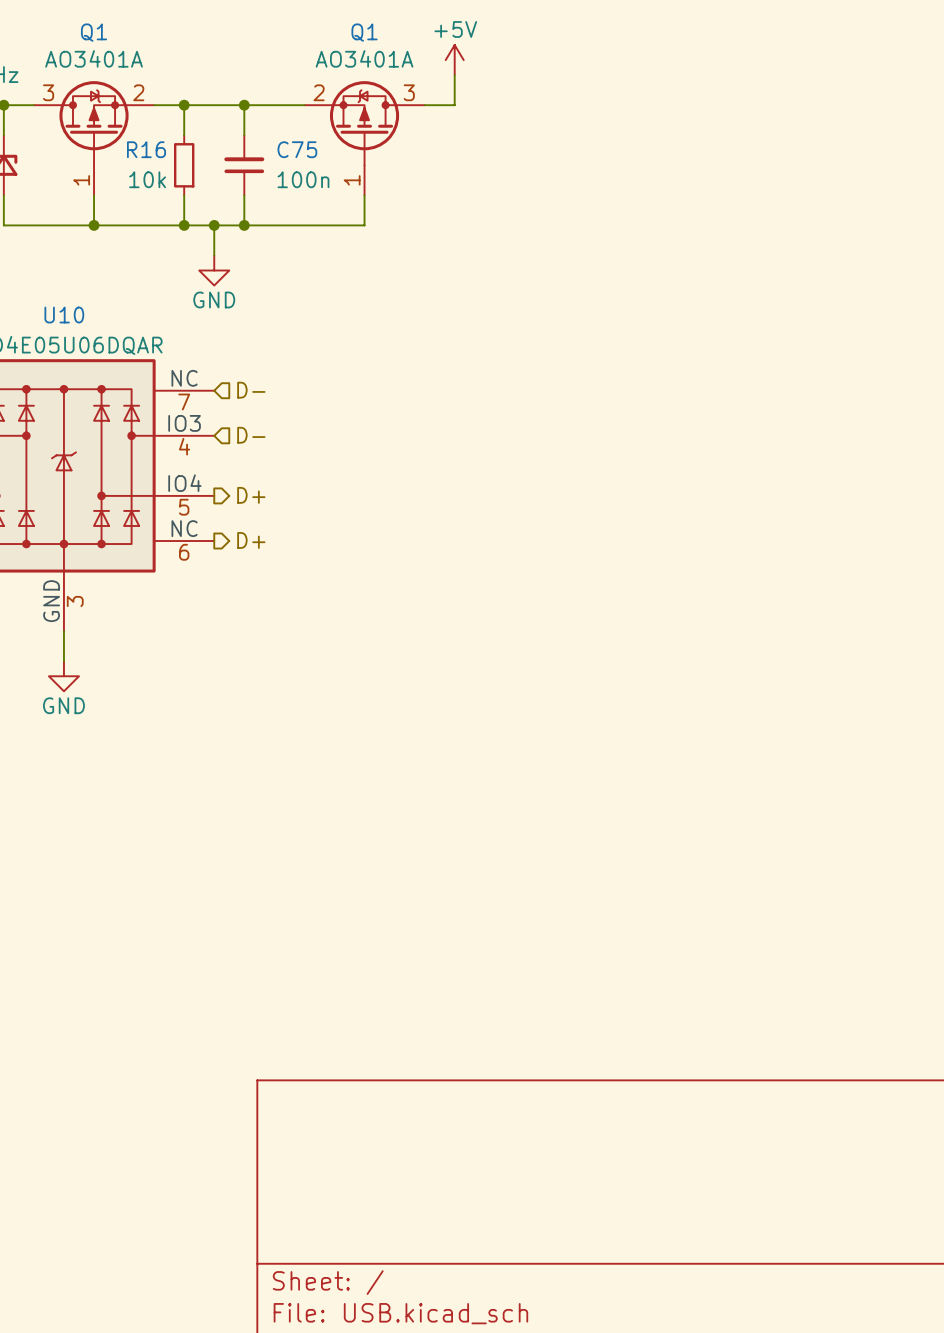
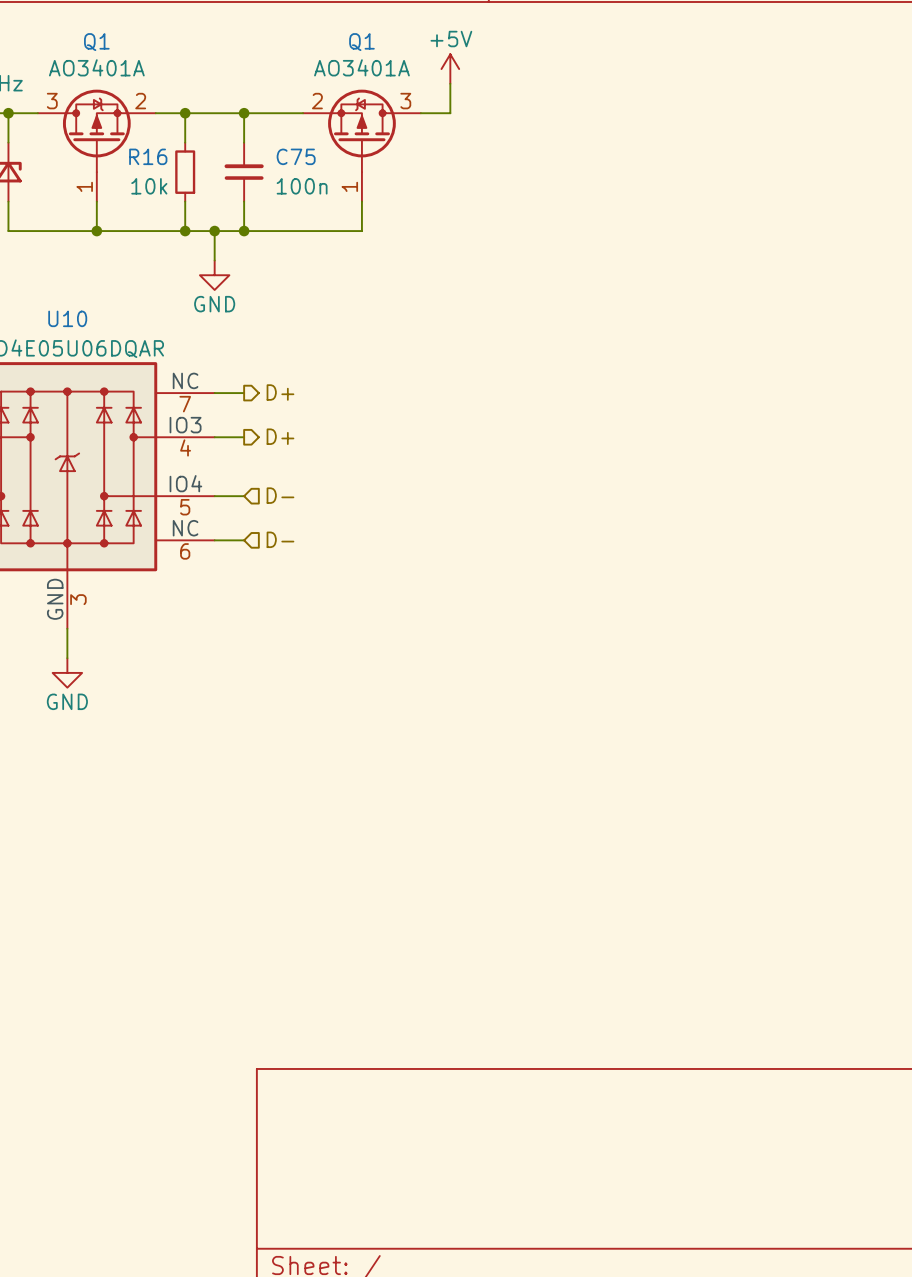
wire: none -> (214, 393) (244, 393)
hierarchical label: D- (251, 390) -> none
hierarchical label: none -> D+ (280, 392)
wire: none -> (214, 437) (244, 437)
hierarchical label: D- (251, 435) -> none
hierarchical label: none -> D+ (280, 436)
wire: none -> (214, 496) (244, 496)
hierarchical label: D+ (251, 495) -> none
hierarchical label: none -> D- (280, 495)
hierarchical label: D+ (251, 540) -> none
hierarchical label: none -> D- (280, 539)
wire: none -> (214, 540) (244, 540)

